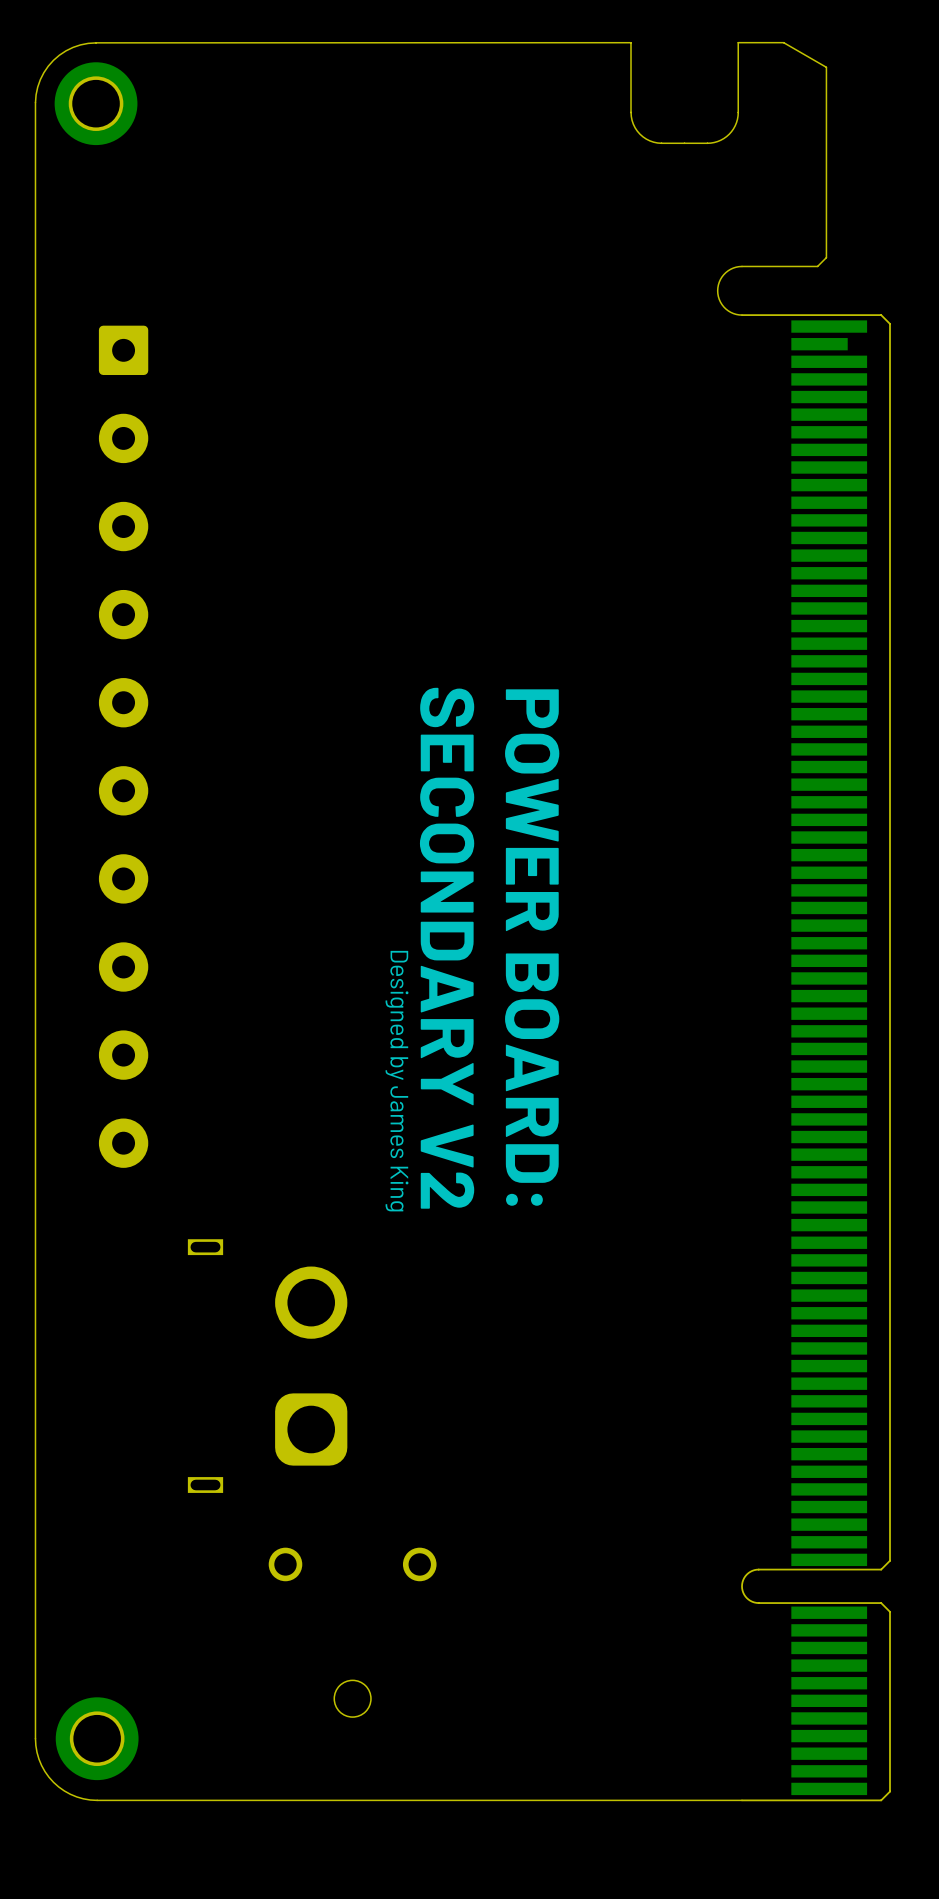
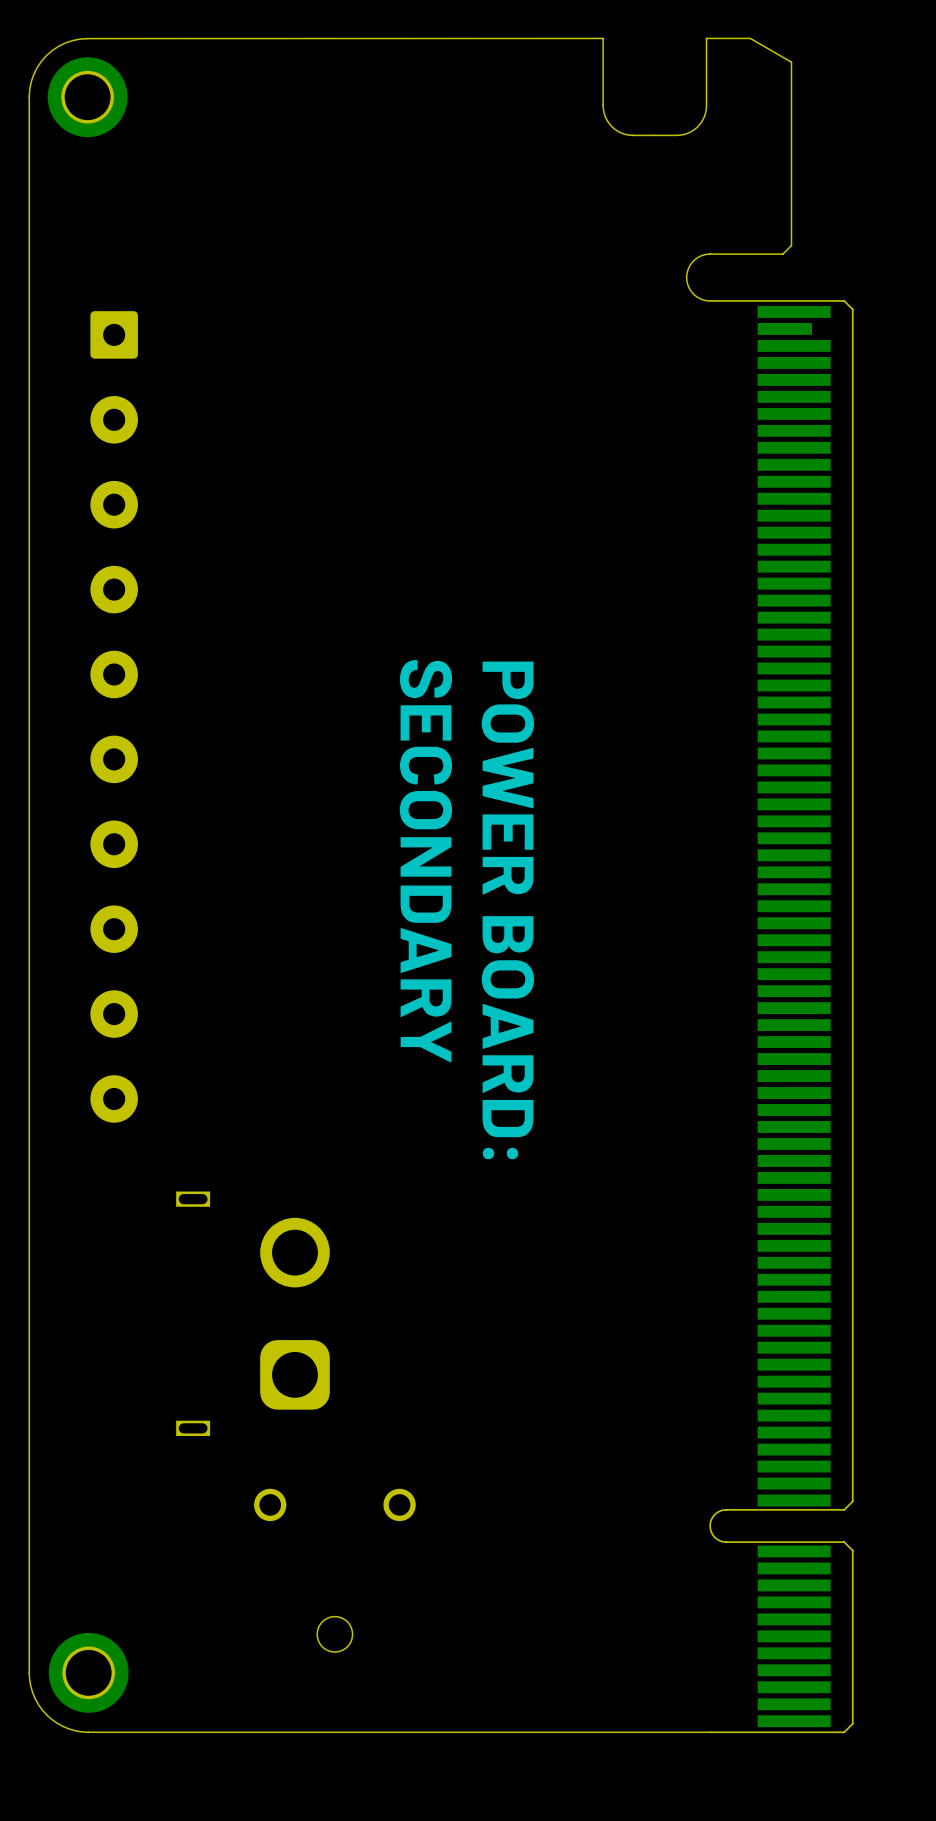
text: SECONDARY V2 (447, 948) -> SECONDARY (425, 861)
text: Designed by James King (396, 1081) -> none

